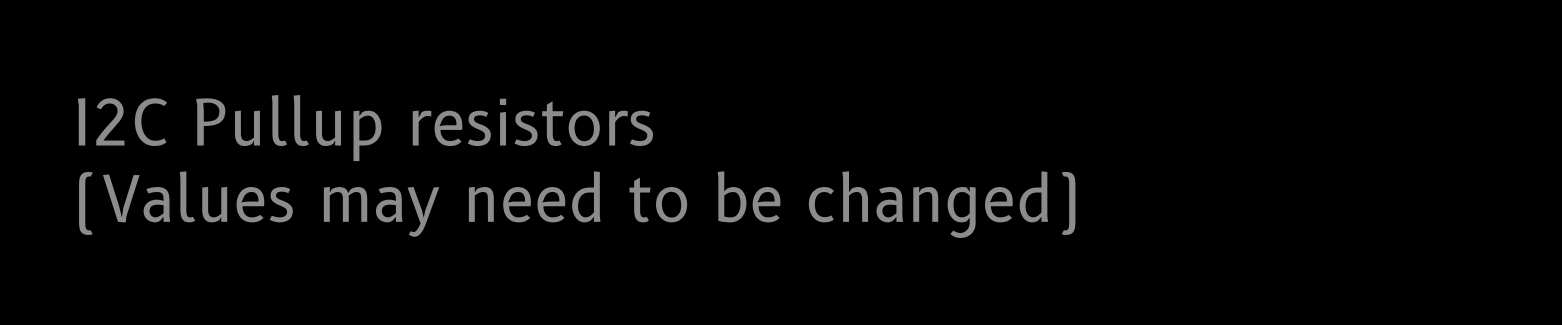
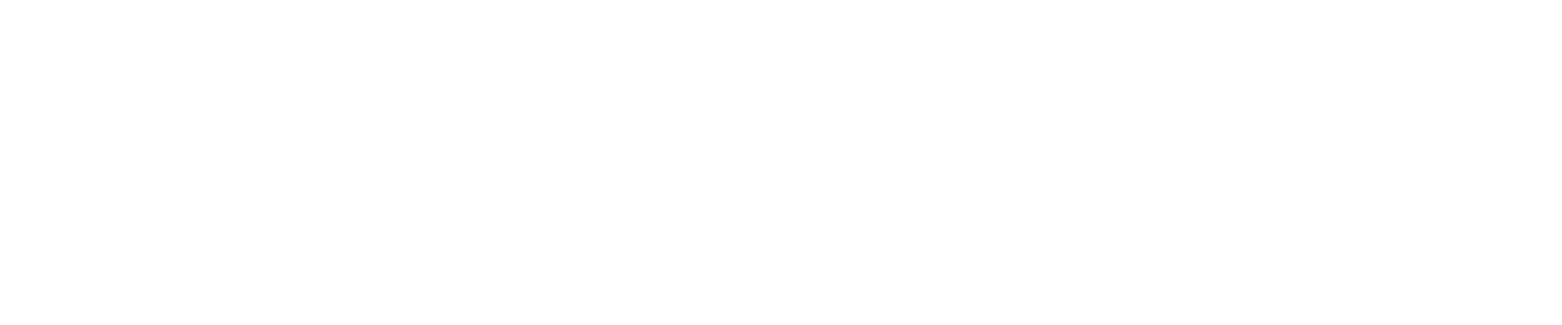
text: I2C Pullup resistors (365, 128) -> none
text: (Values may need to be changed) (577, 204) -> none

